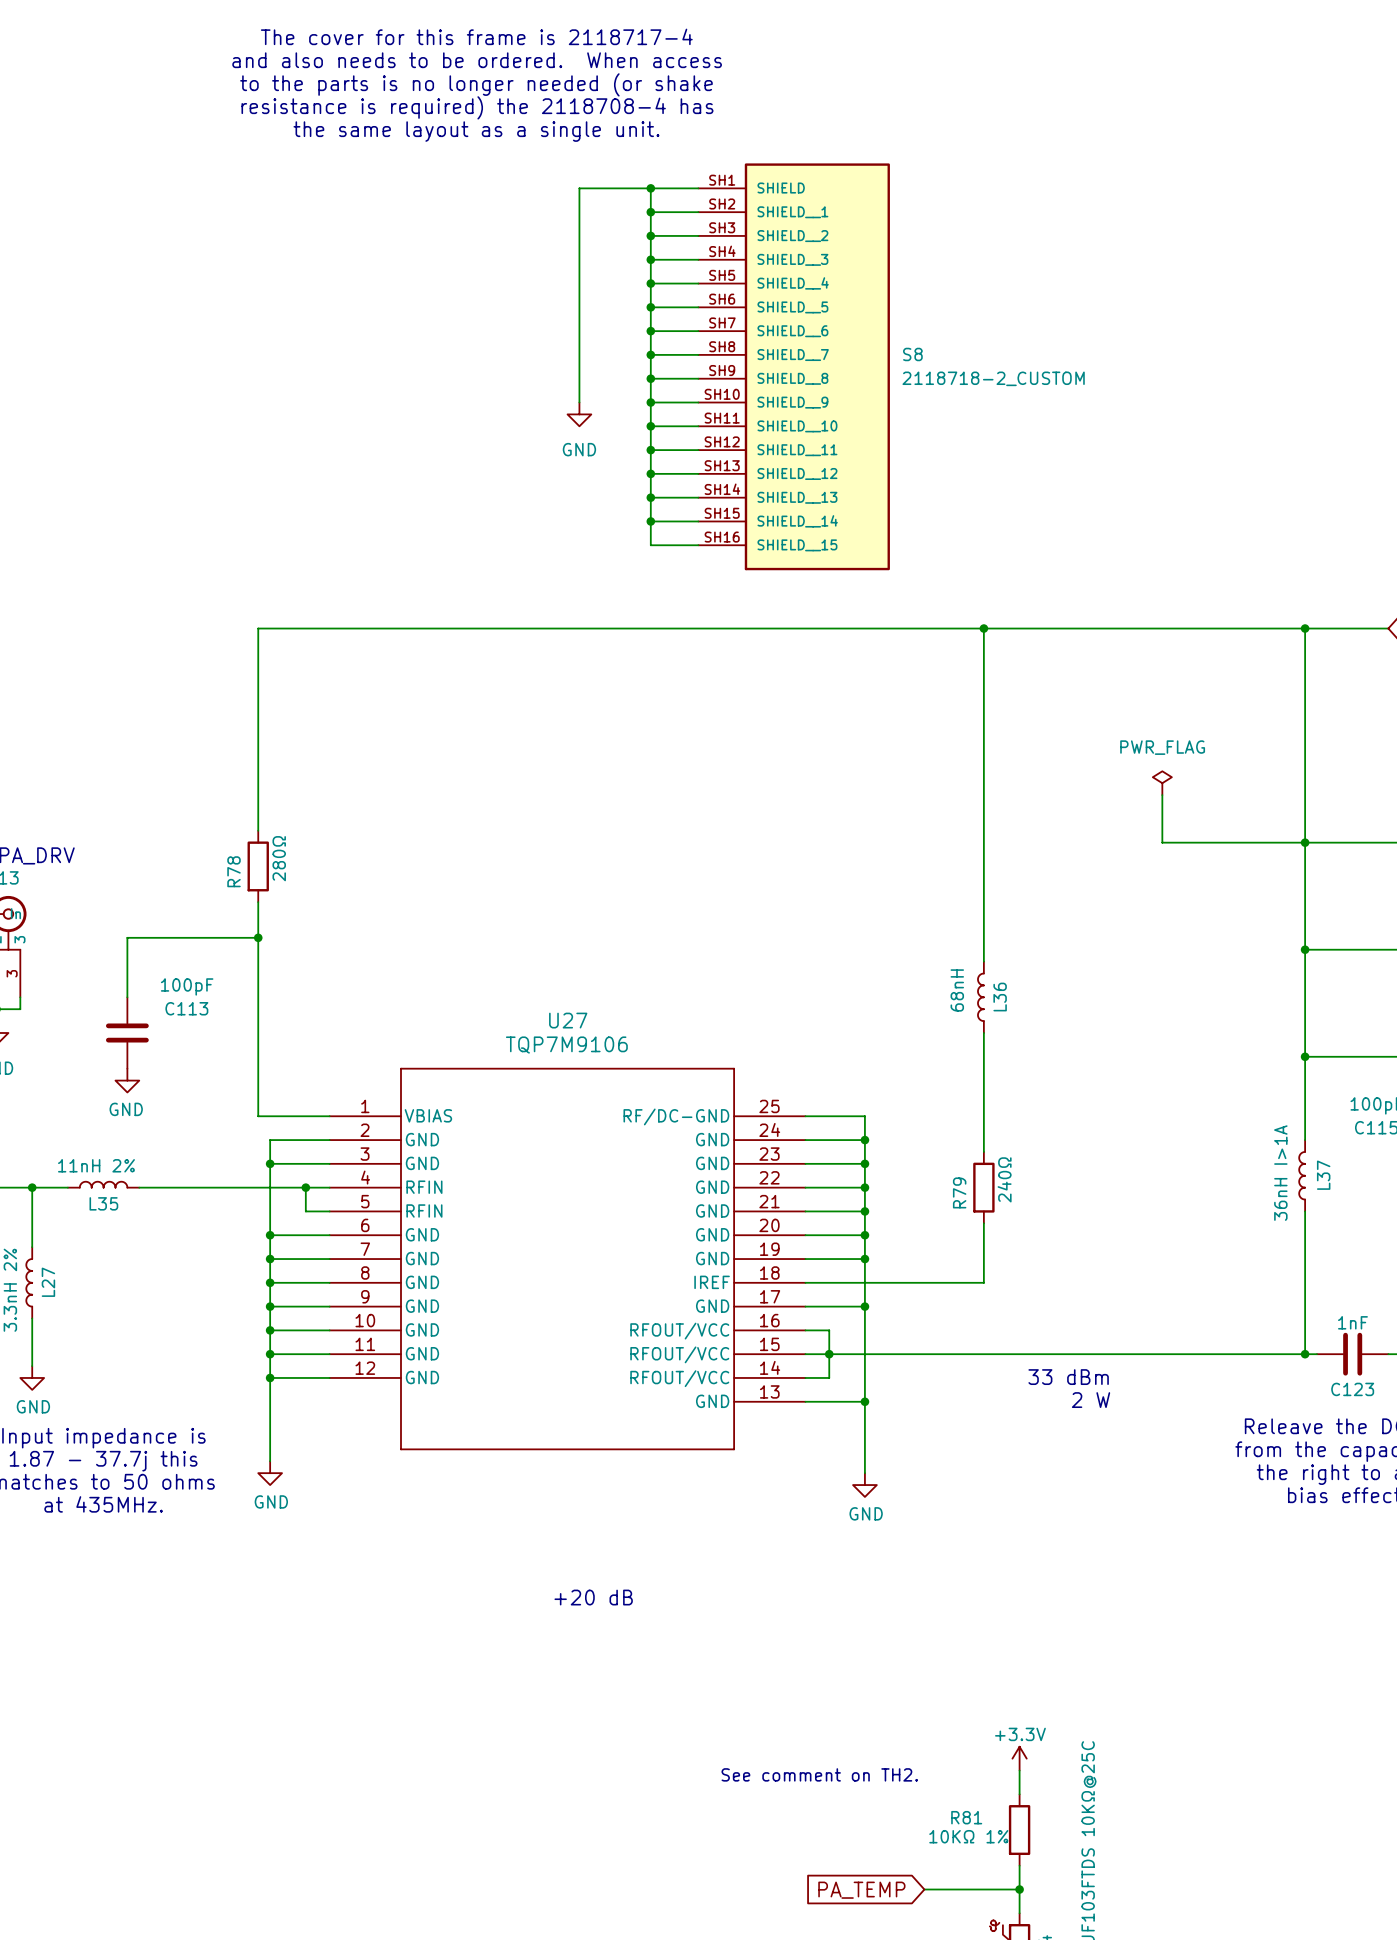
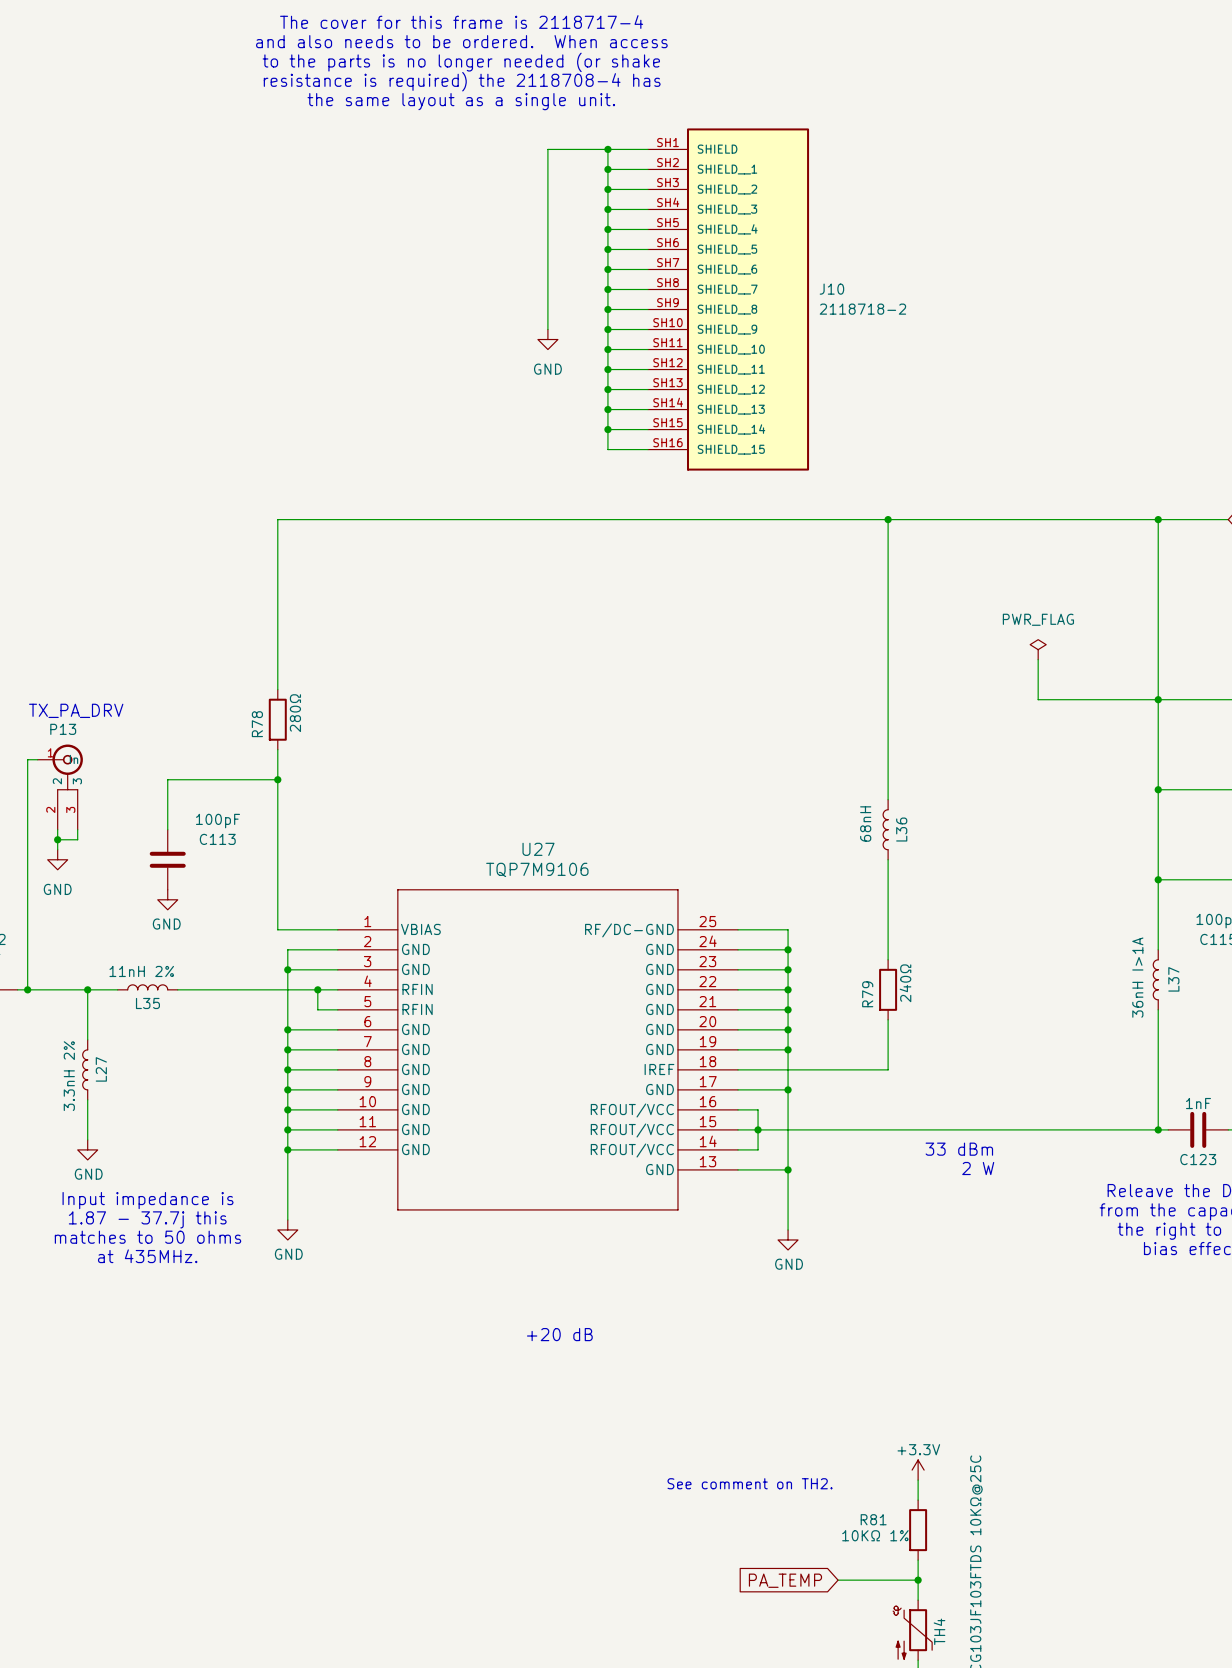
S8 name: S8 (912, 354) -> J10 (831, 289)
S8 value: 2118718-2_CUSTOM (993, 378) -> 2118718-2 (862, 309)

